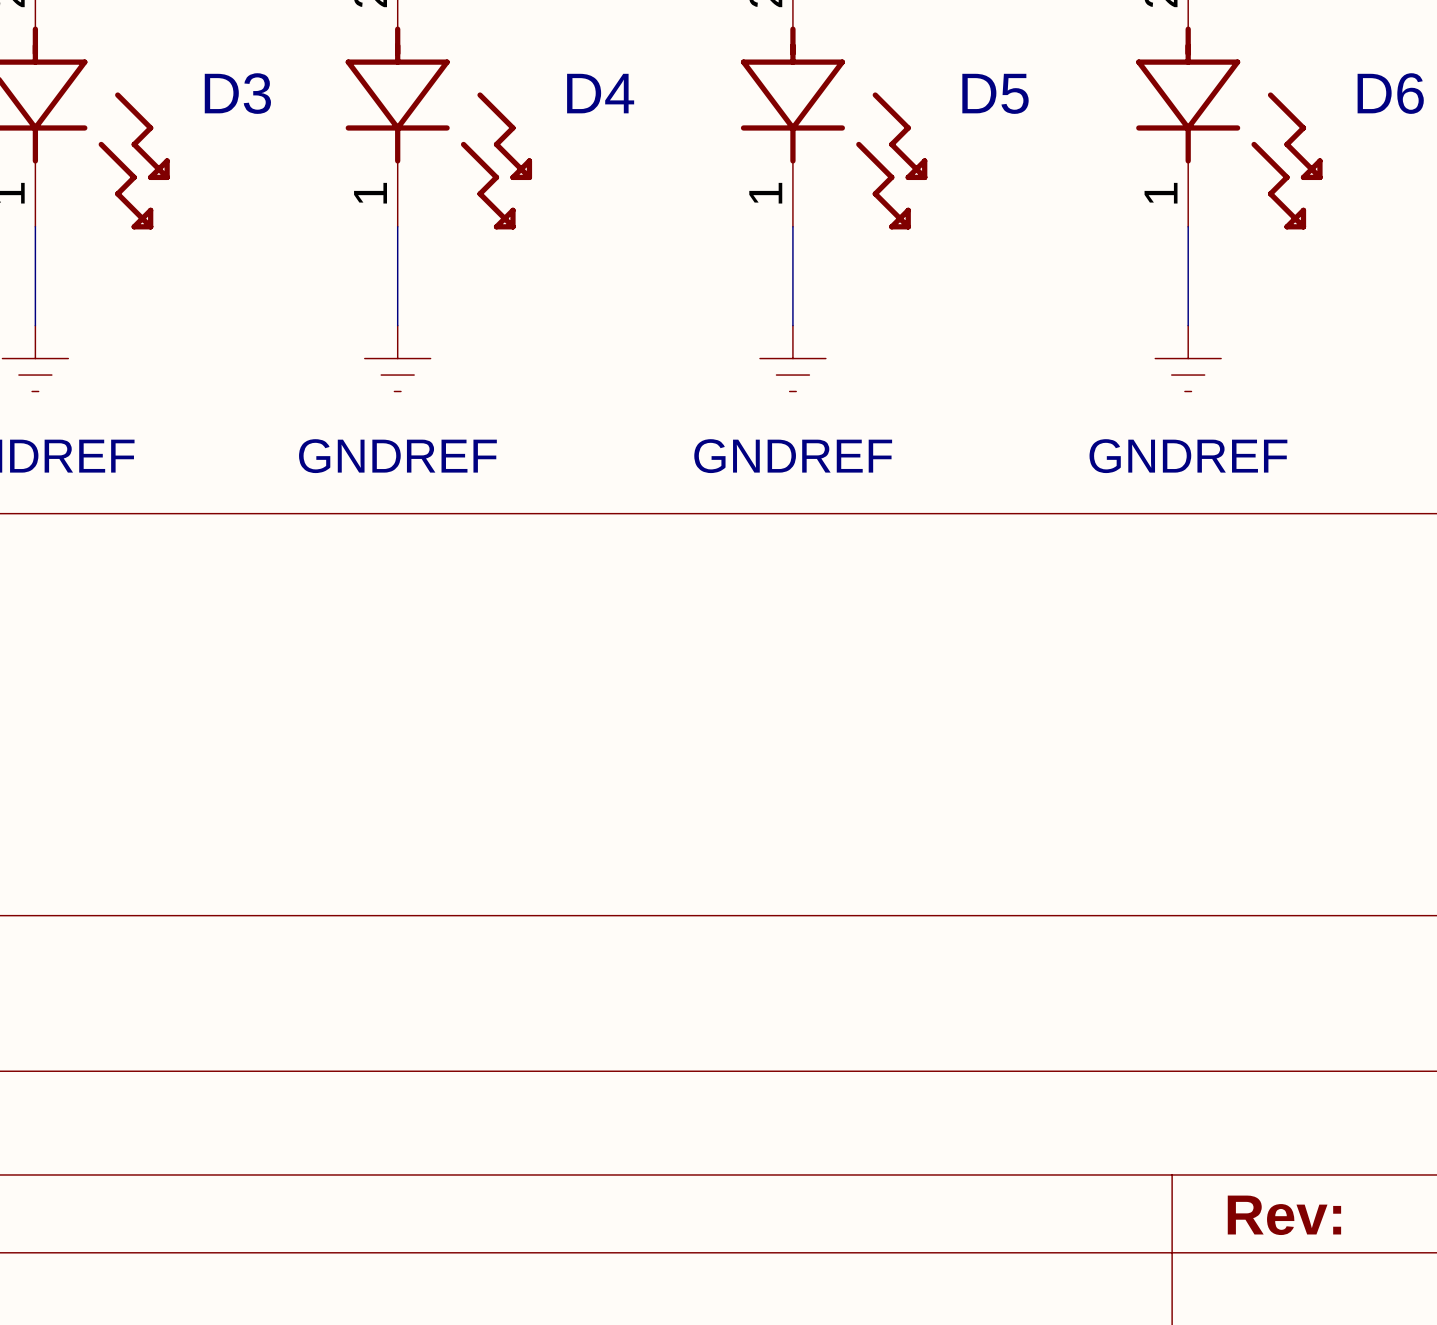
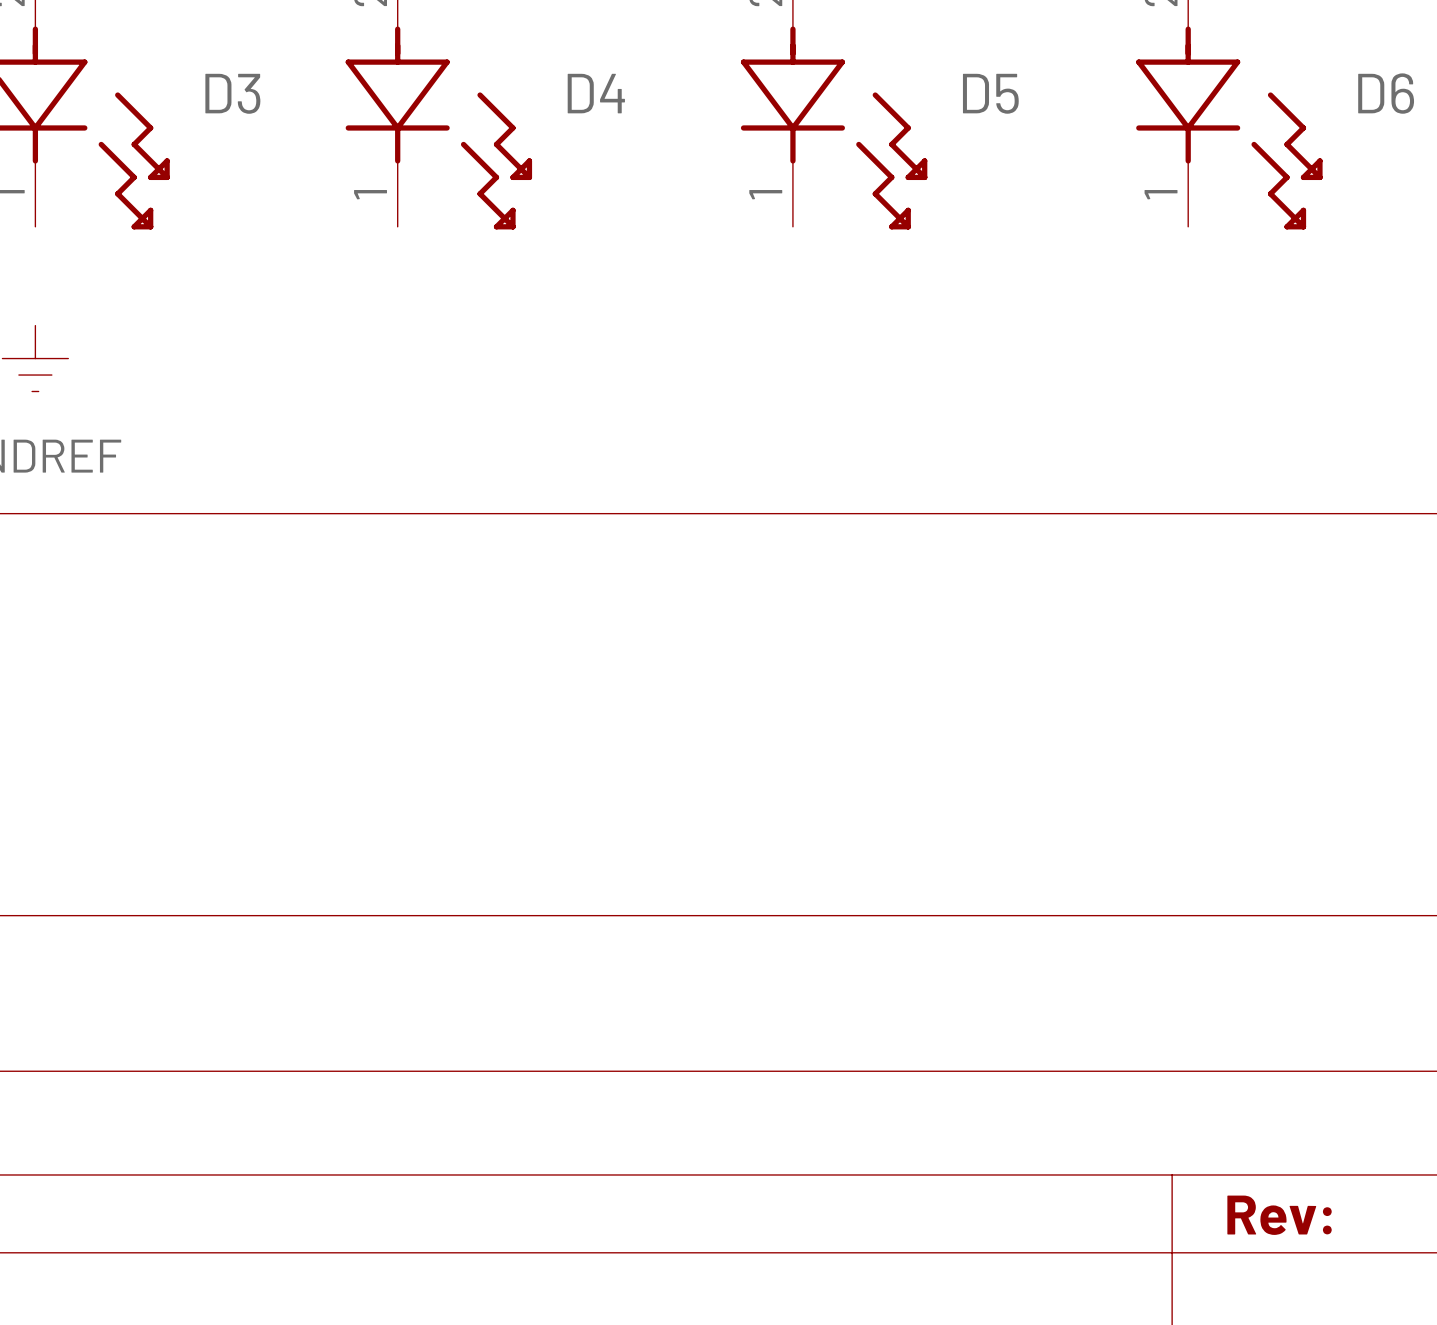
wire: (35, 226) (35, 325) -> none
wire: (397, 226) (397, 325) -> none
wire: (792, 226) (792, 325) -> none
wire: (1188, 226) (1188, 325) -> none
power symbol: GNDREF (397, 358) -> none
power symbol: GNDREF (792, 358) -> none
power symbol: GNDREF (1188, 358) -> none

